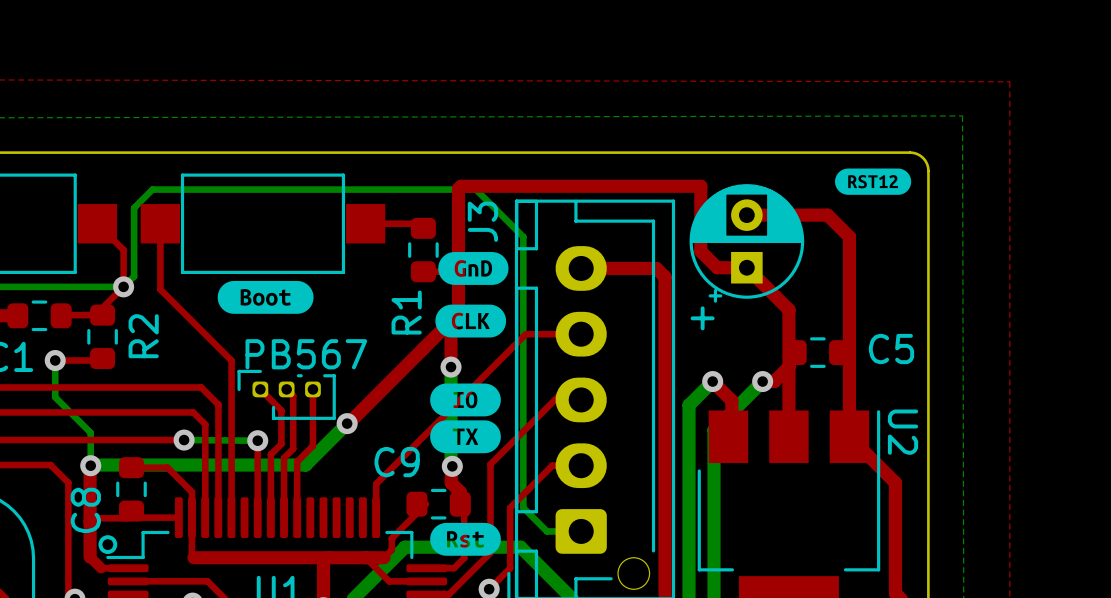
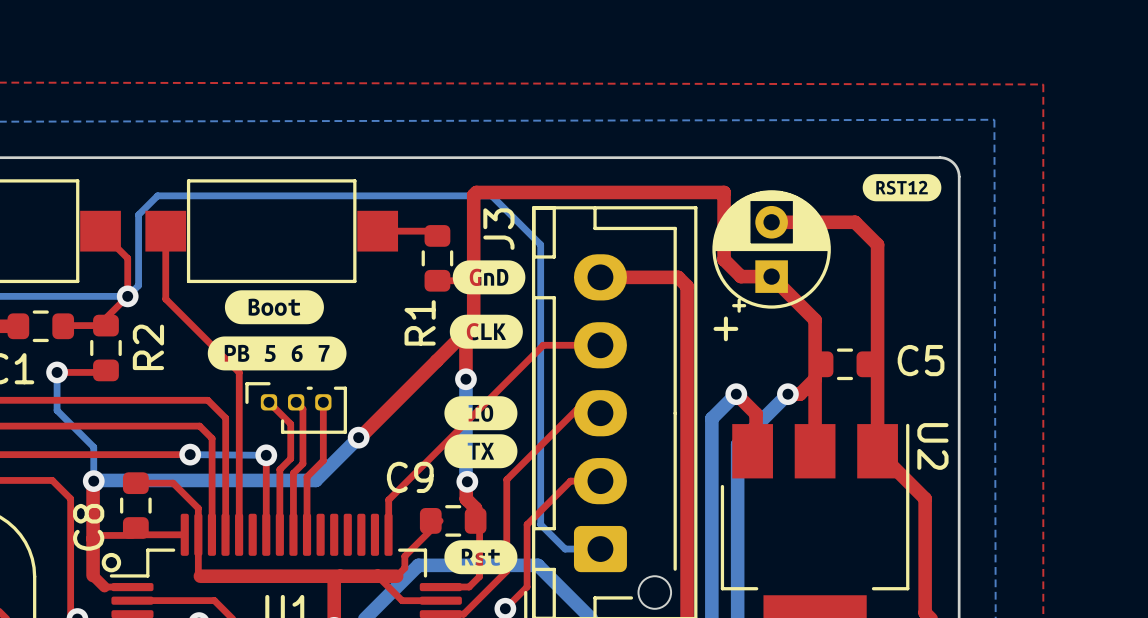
drawing: none -> [207, 336, 347, 371]
PB567 name: PB567 (306, 354) -> none

